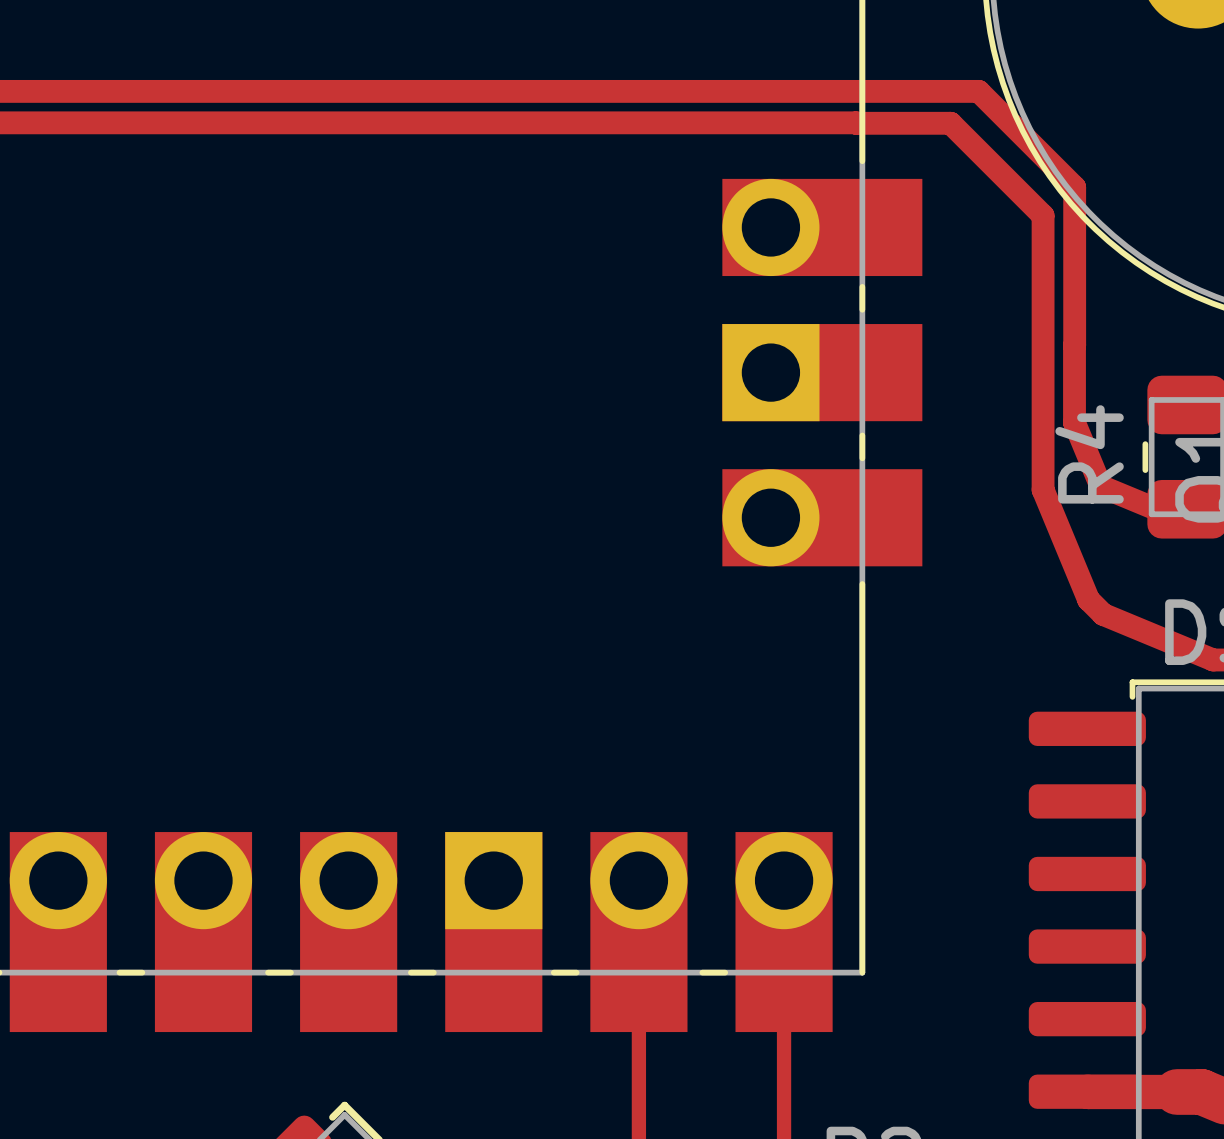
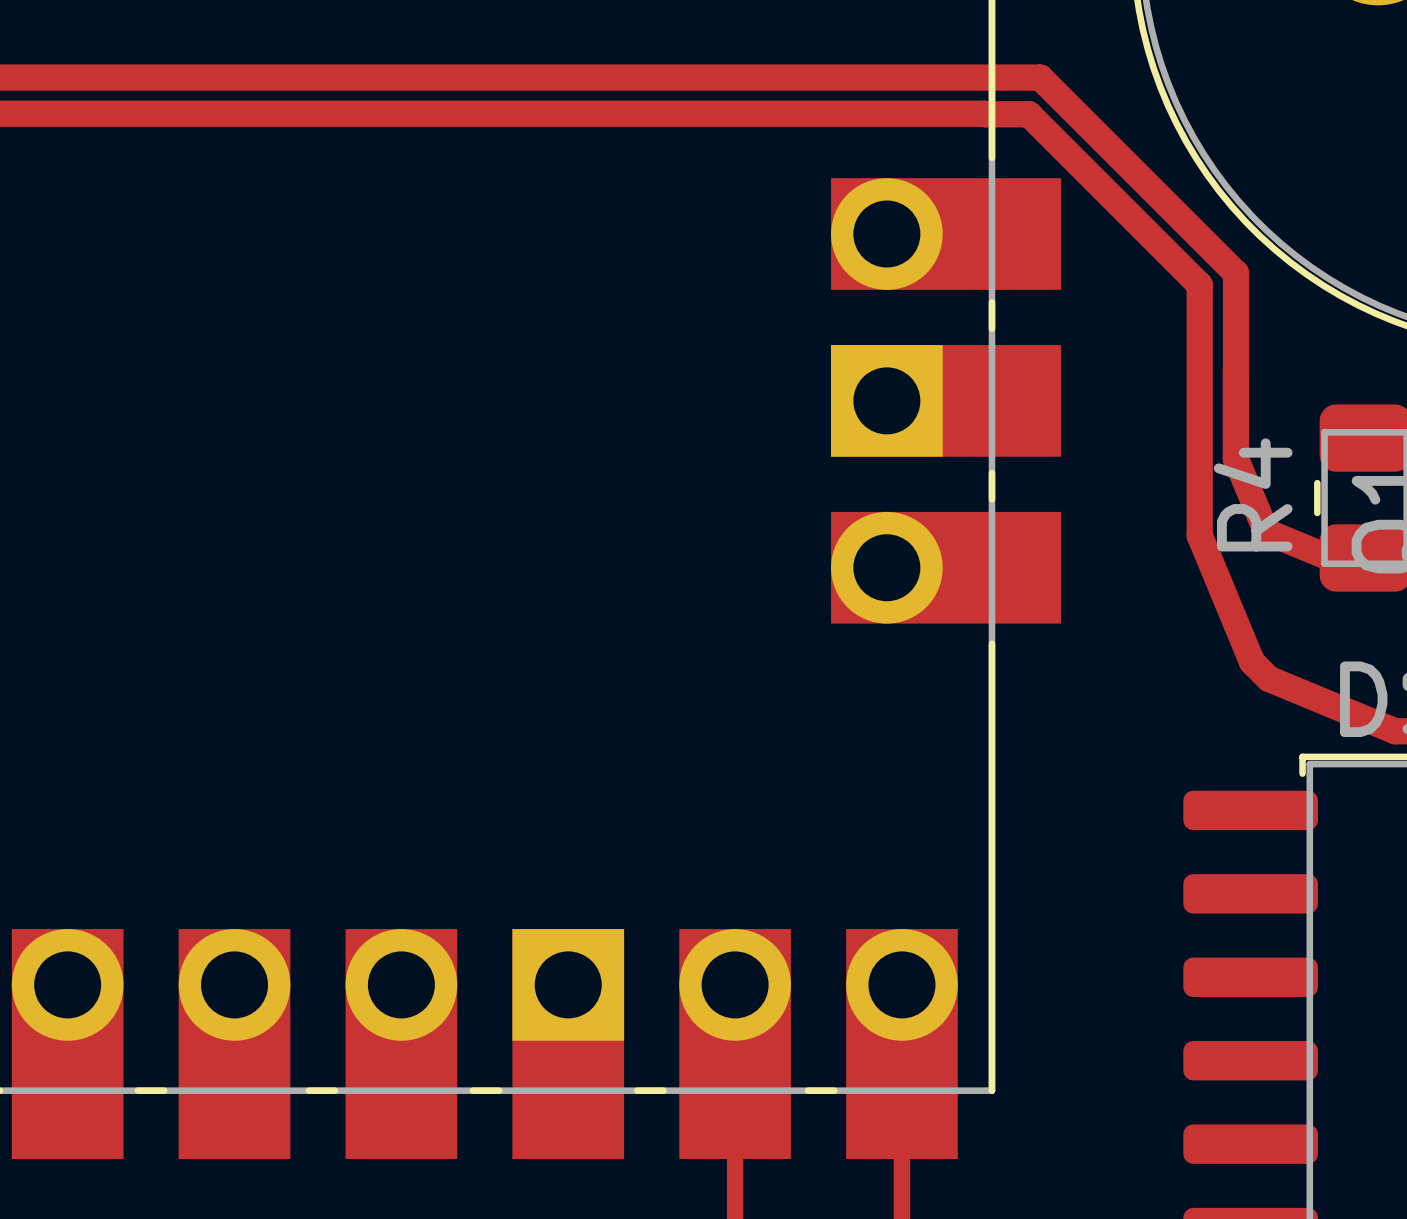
track: (904, 91) (978, 91) (1074, 187) (1074, 261) -> (1040, 77) (1236, 273)
track: (894, 123) (950, 123) (1043, 215) (1043, 271) -> (1028, 114) (1199, 285)

